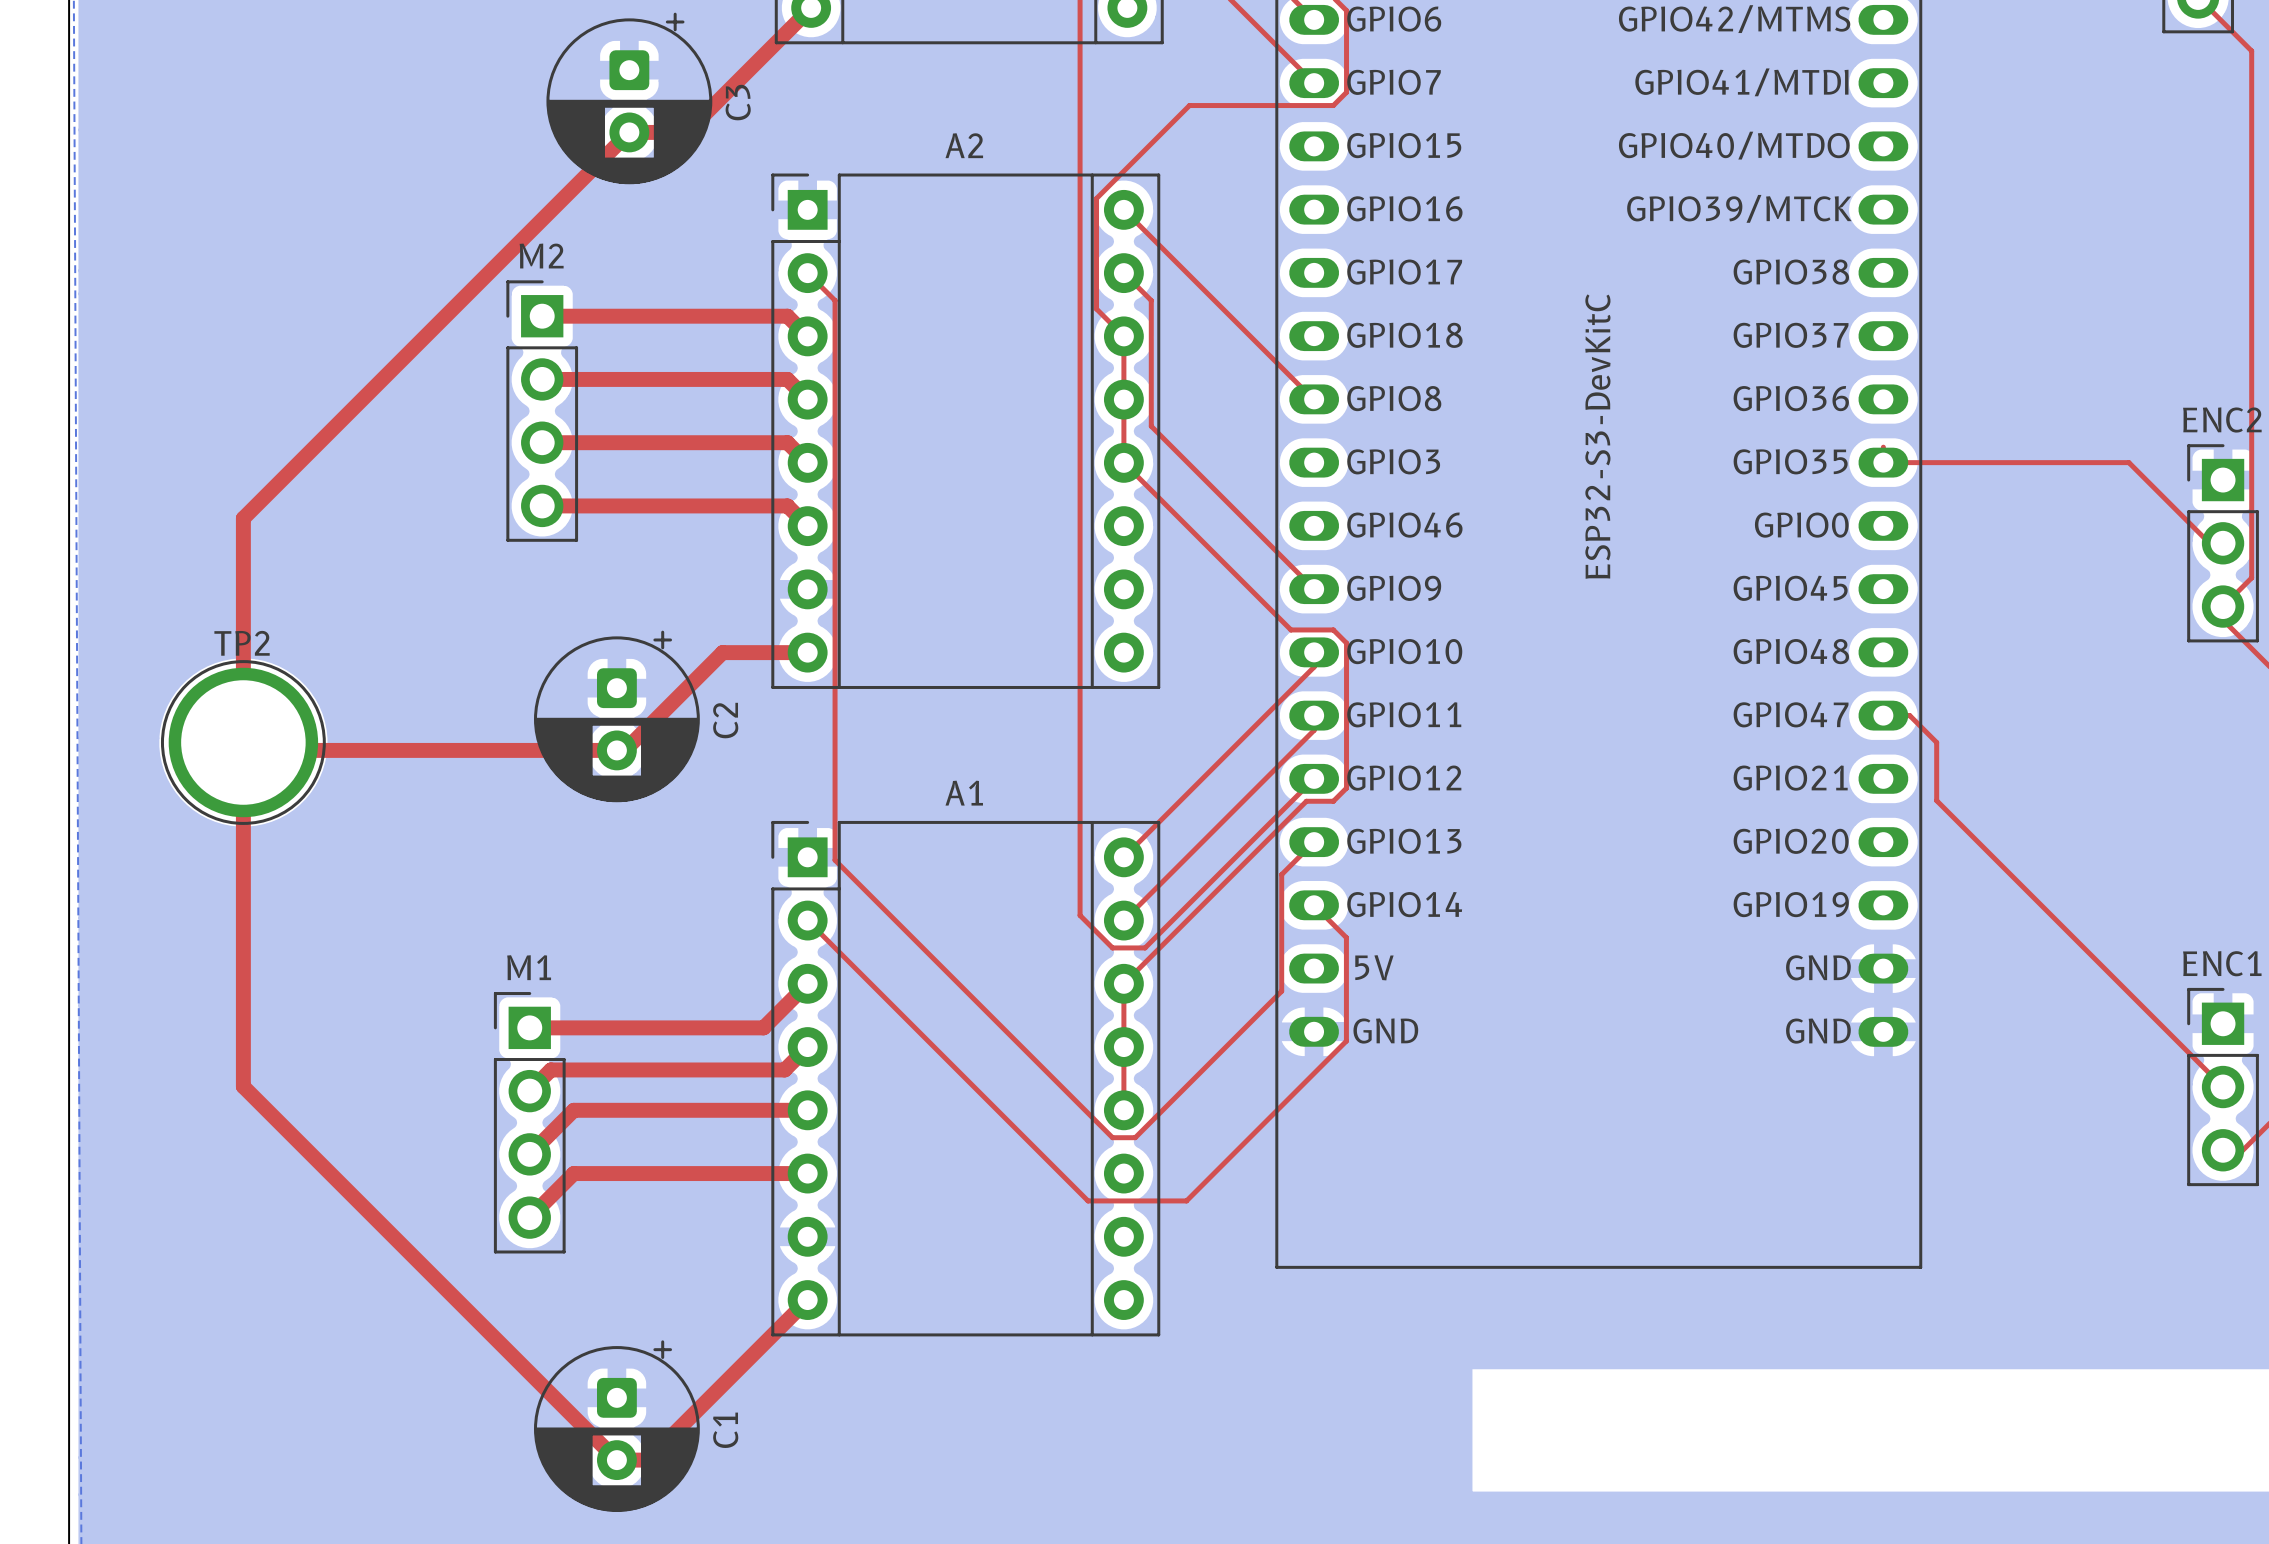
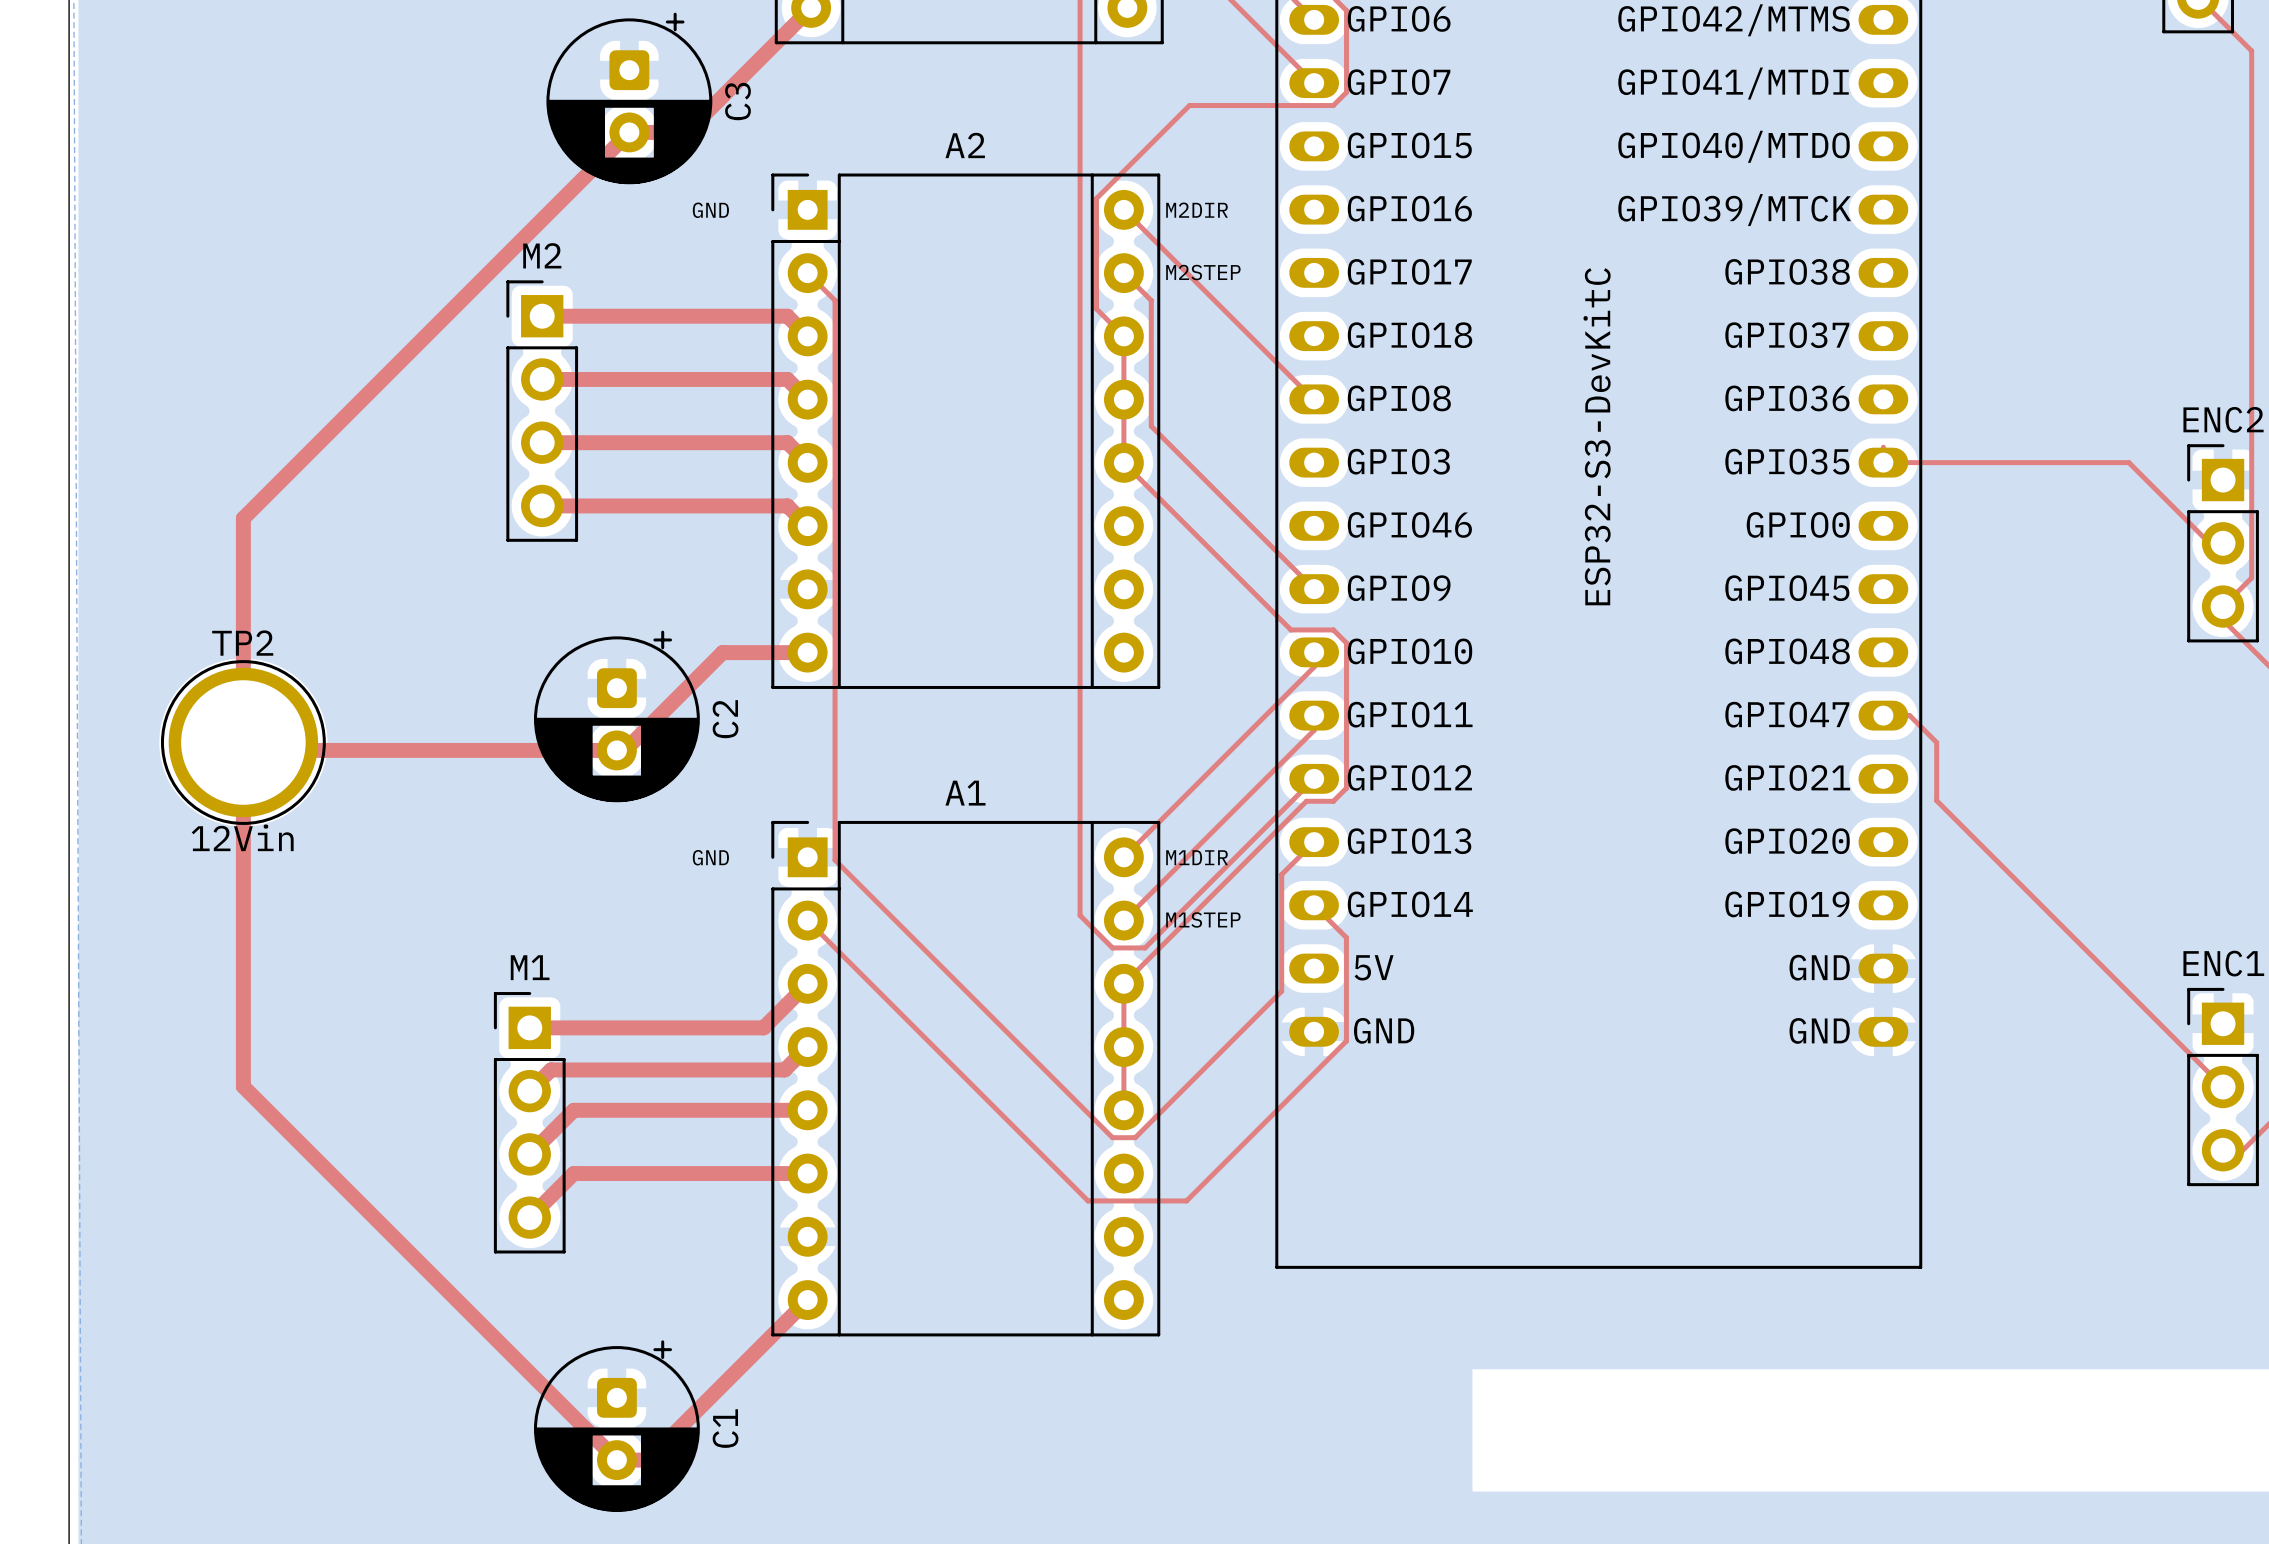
text: none -> GND (710, 210)
text: none -> M2DIR (1197, 210)
text: none -> M2STEP (1203, 272)
TP2 value: none -> 12Vin (242, 837)
text: none -> GND (710, 857)
text: none -> M1DIR (1197, 857)
text: none -> M1STEP (1203, 919)

